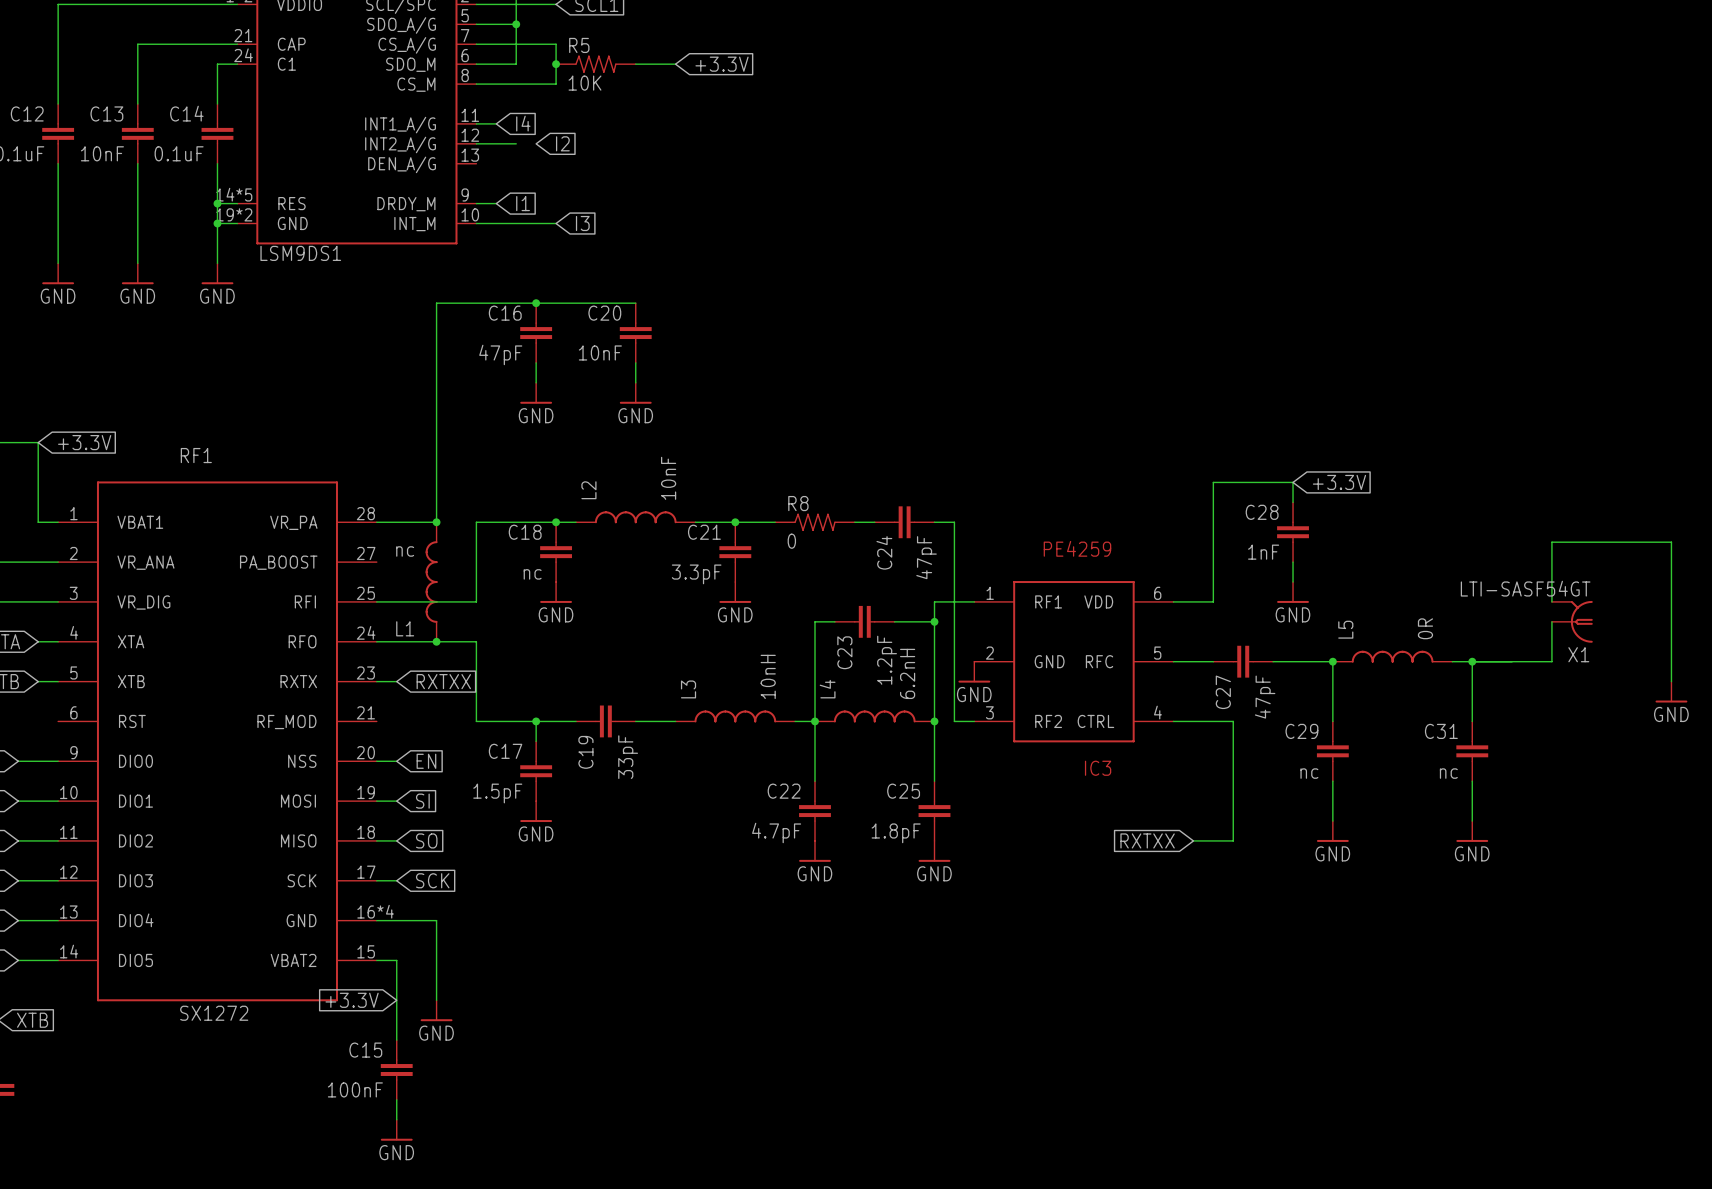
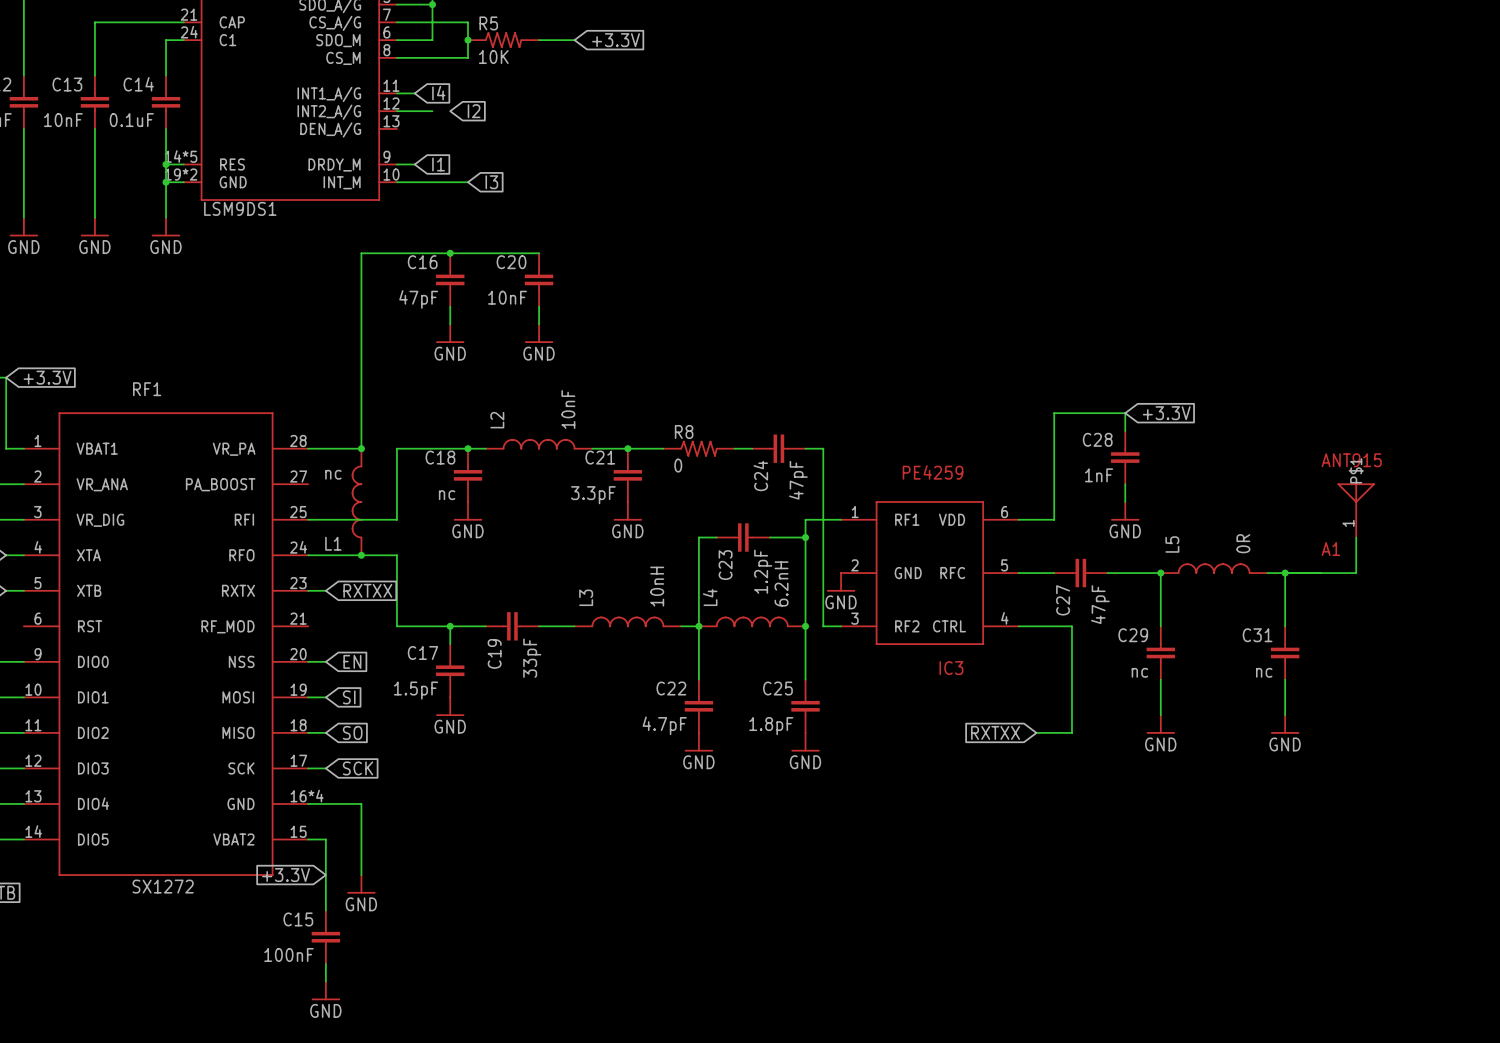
A1: none -> ANT915 (1356, 510)
wire: (1551, 601) (1551, 542) (1671, 542) (1671, 681) -> none
X1: LTI-SASF54GT (1572, 621) -> none
power symbol: GND (1671, 692) -> none

